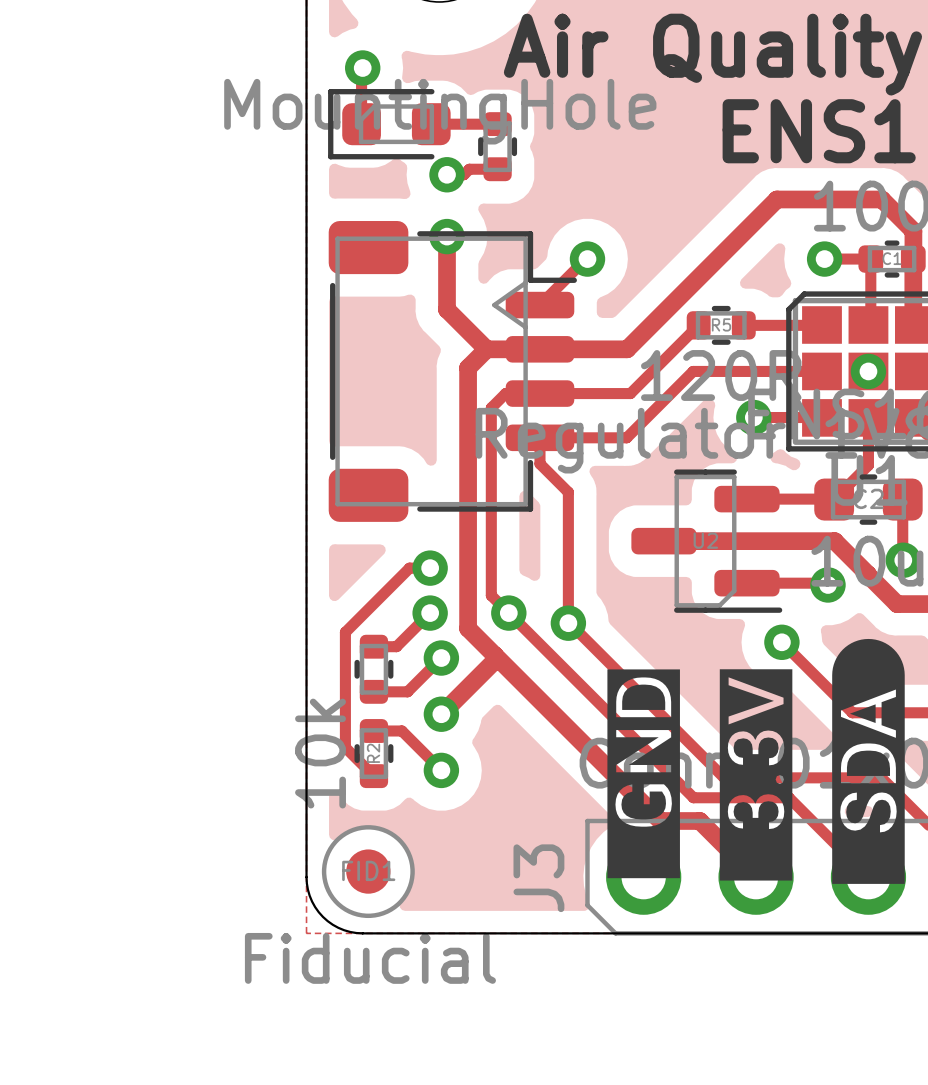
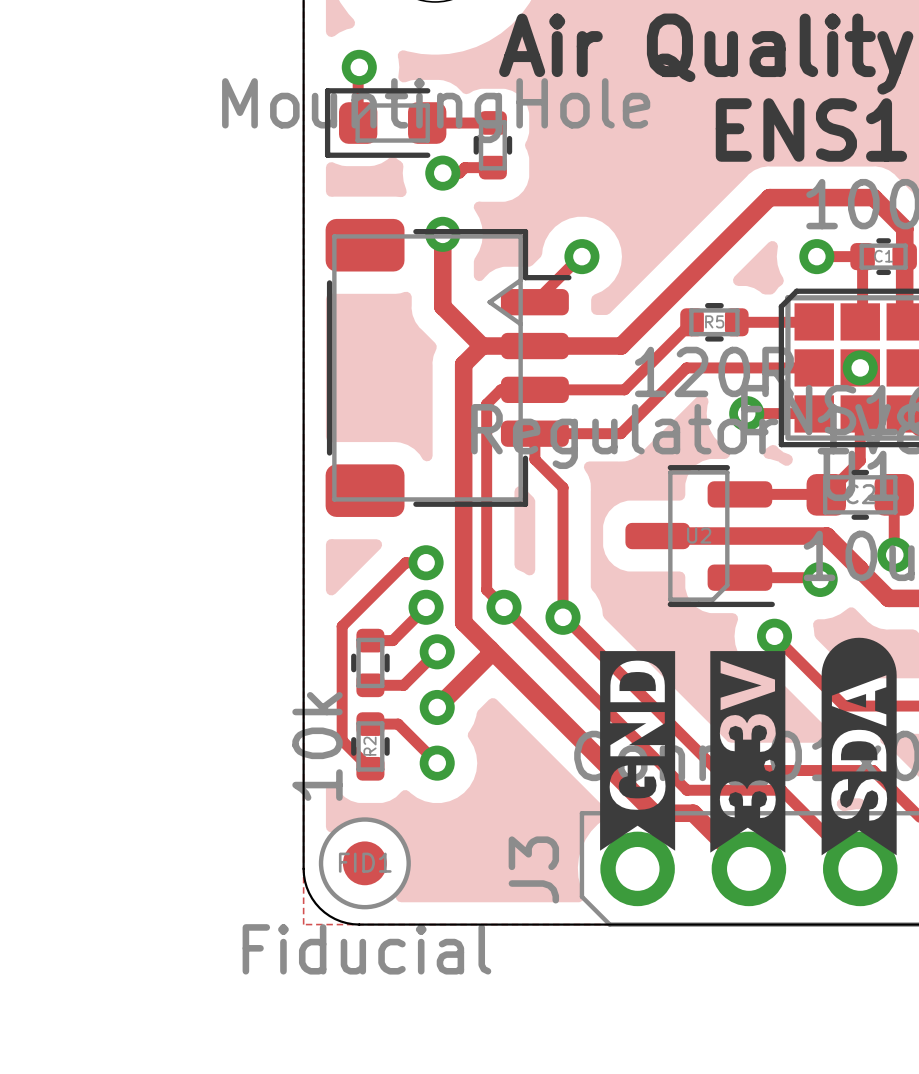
drawing shape: [832, 638, 905, 884] -> [821, 637, 897, 856]
drawing shape: [607, 669, 680, 879] -> [600, 651, 676, 851]
drawing shape: [719, 669, 793, 881] -> [710, 651, 786, 853]

